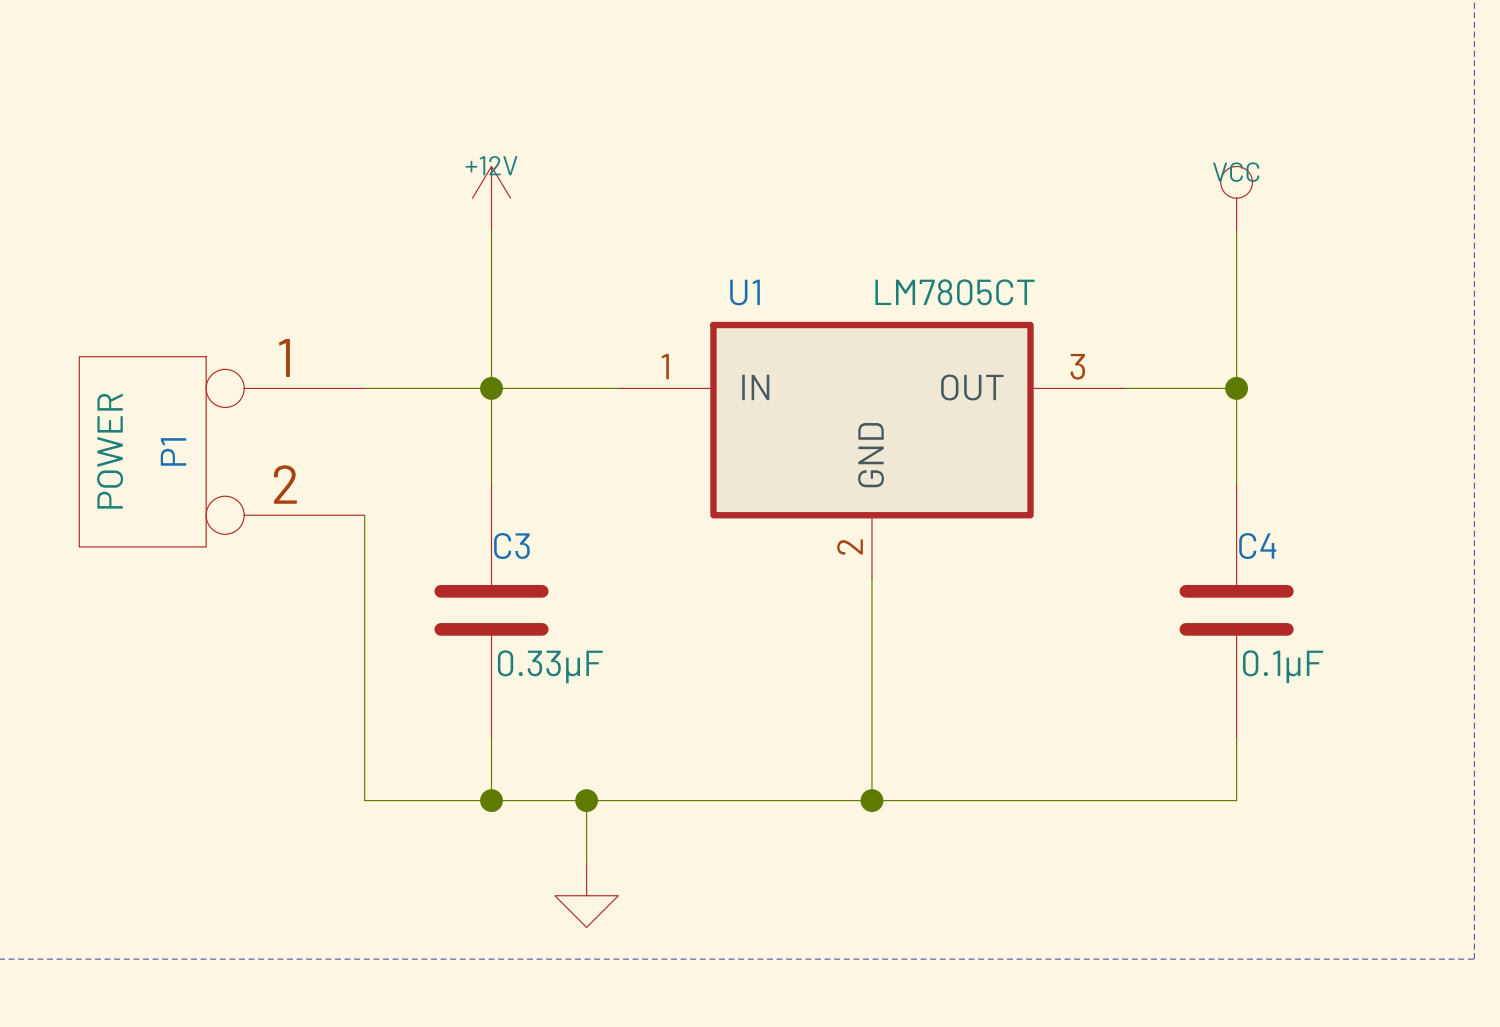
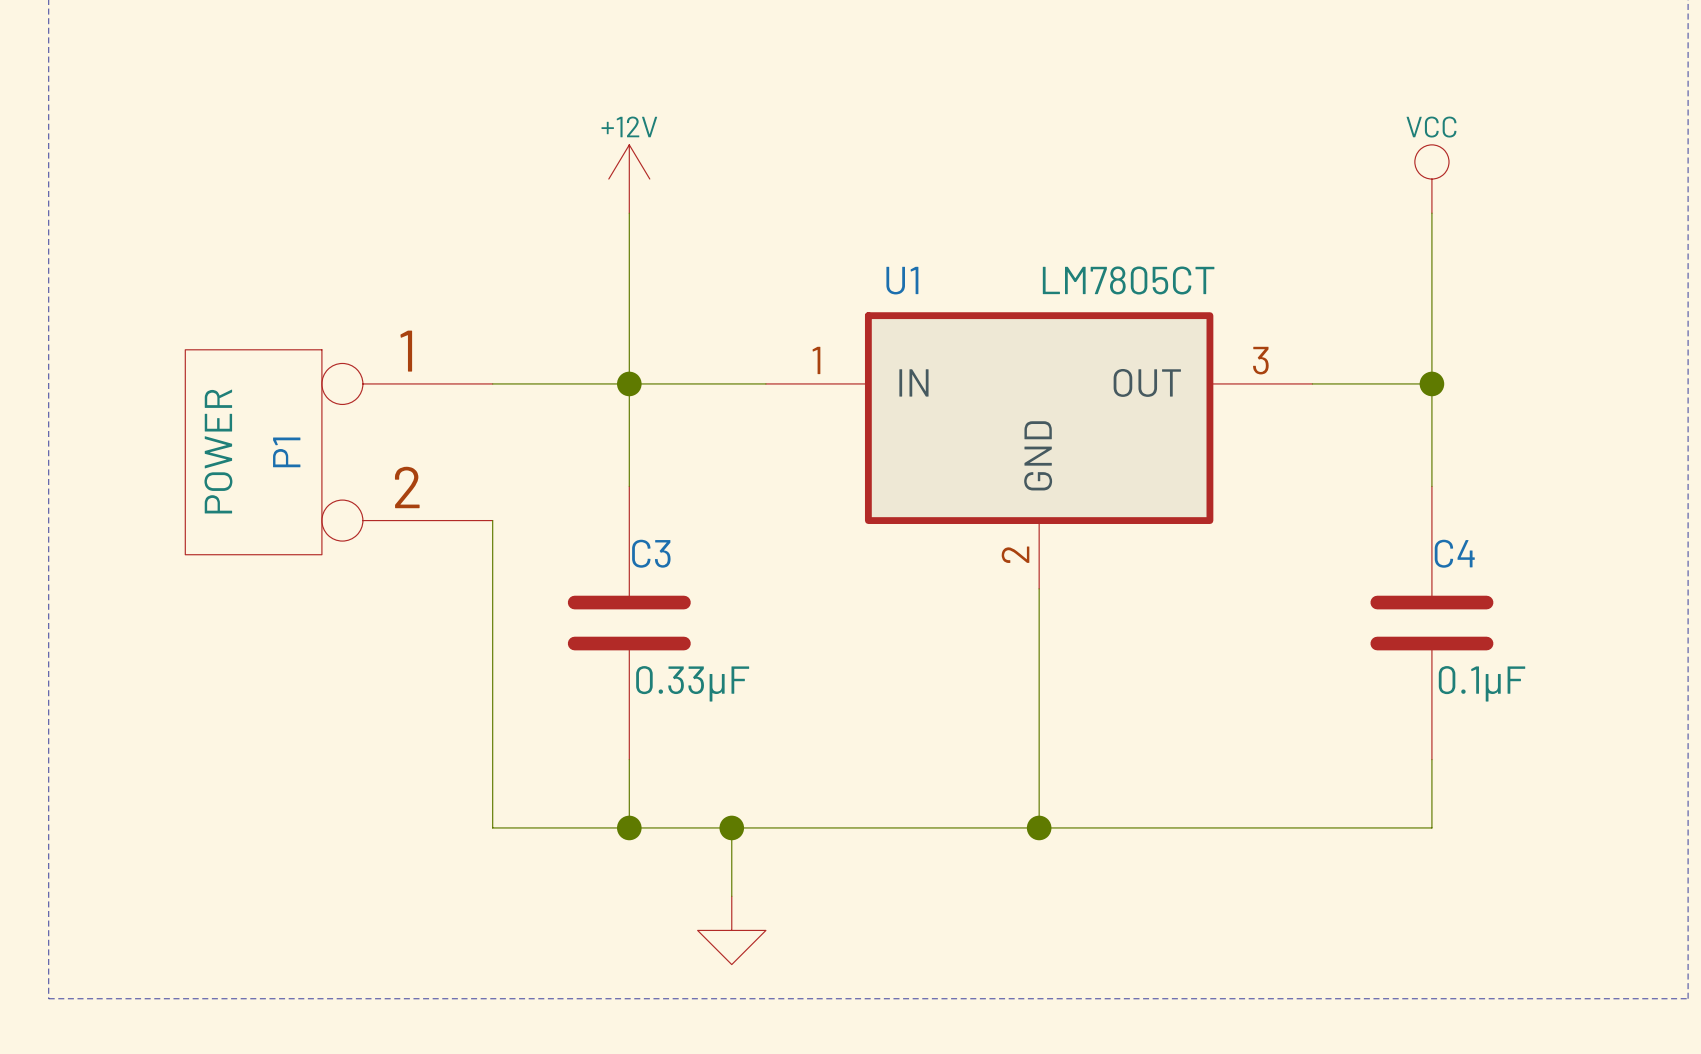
power symbol text position: +12V (491, 165) -> +12V (629, 126)
power symbol text position: VCC (1236, 172) -> VCC (1431, 127)

